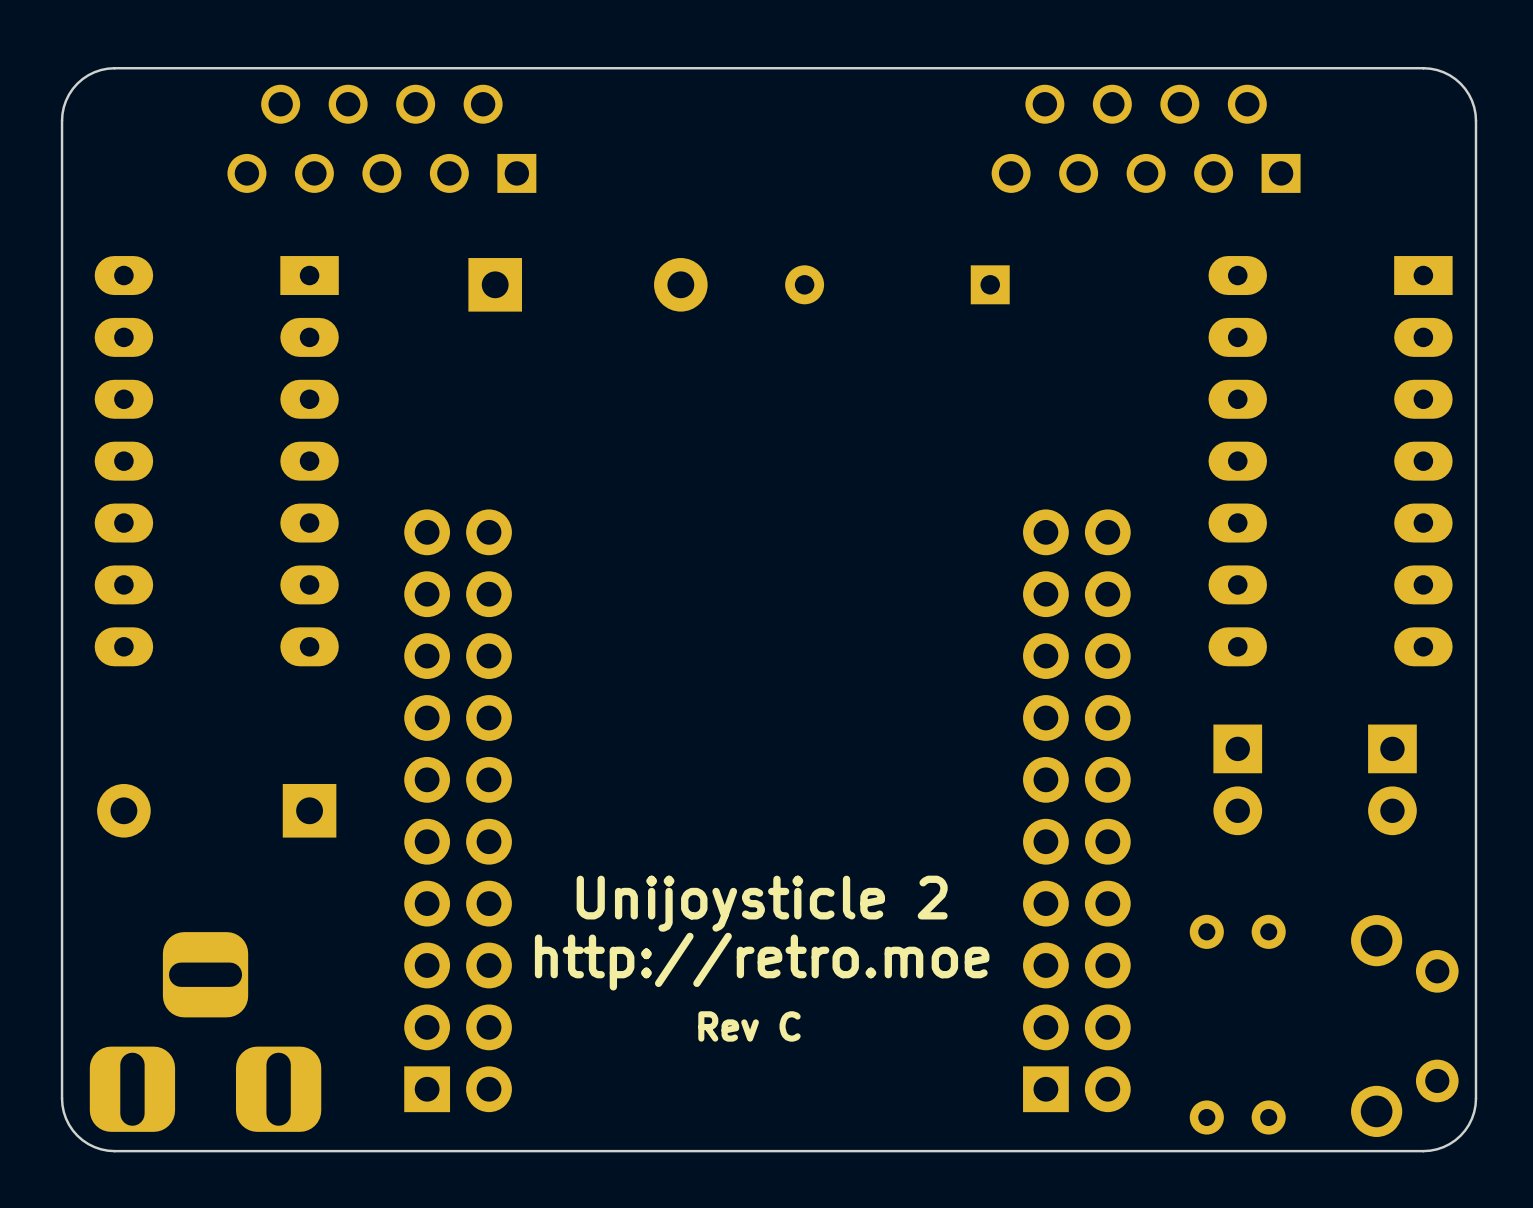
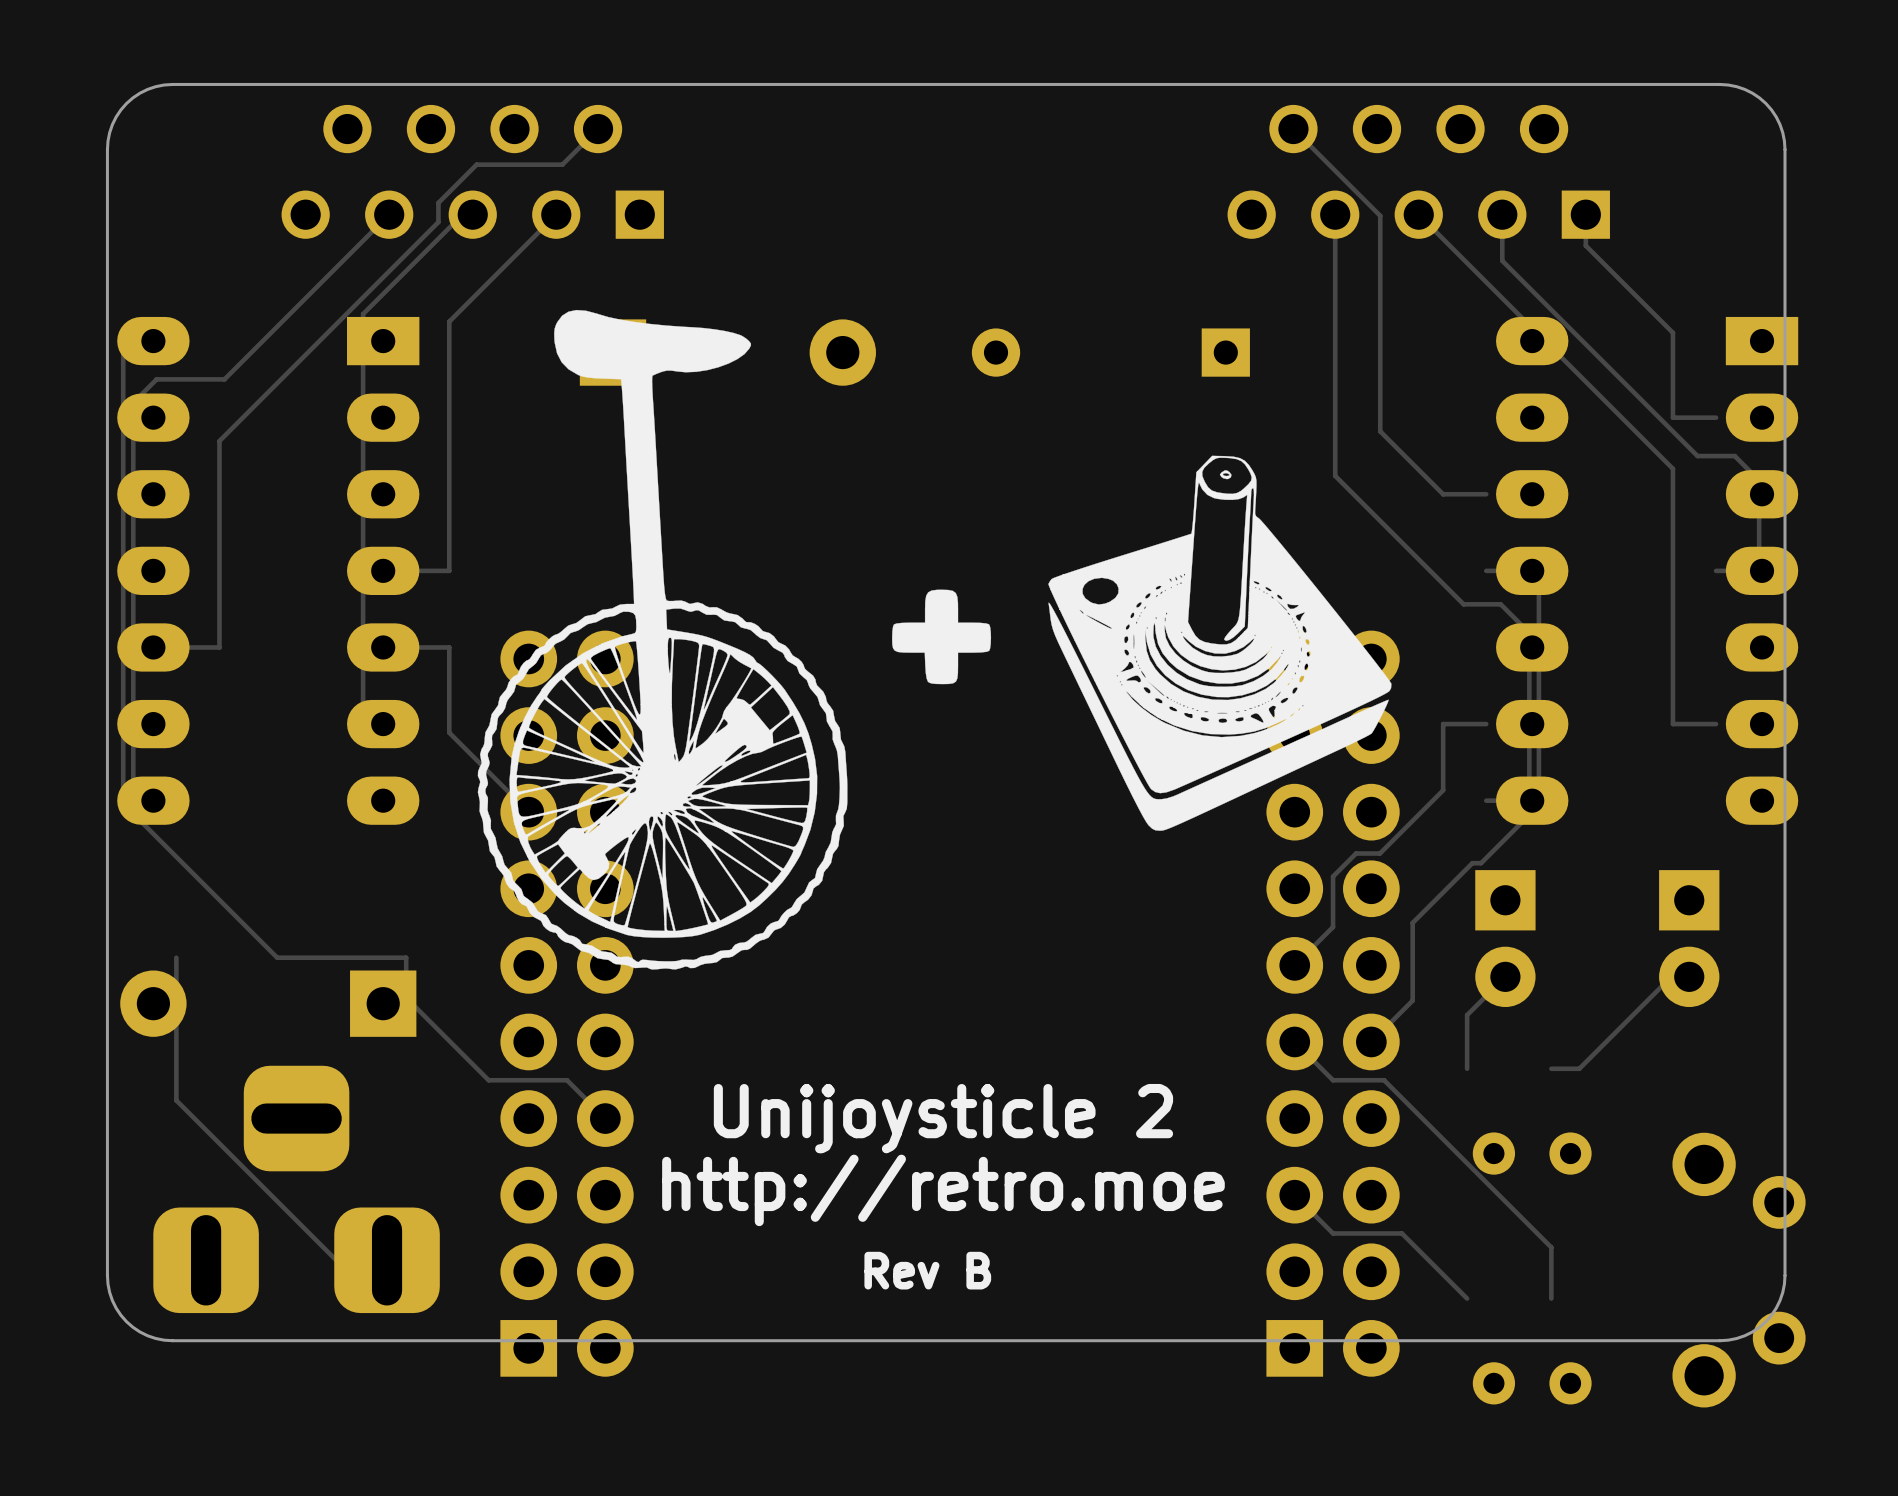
board edge: (1389, 68) (1430, 68) (1449, 75) (1460, 83) (1468, 94) (1474, 107) (1475, 120) (1475, 1098) (1471, 1118) (1460, 1135) (1443, 1147) (1423, 1151) (114, 1151) (94, 1147) (82, 1140) (69, 1124) (63, 1112) (62, 1098) (62, 120) (63, 107) (69, 94) (82, 79) (94, 72) (107, 68) (139, 68) -> (1719, 84) (1744, 89) (1765, 103) (1780, 124) (1785, 149) (1785, 1275) (1780, 1300) (1765, 1321) (1744, 1335) (1719, 1340) (172, 1340) (155, 1338) (132, 1327) (116, 1308) (109, 1292) (107, 1275) (107, 149) (112, 124) (126, 103) (147, 89) (172, 84)
track: none -> (598, 129) (562, 164) (476, 164) (438, 202) (438, 222) (219, 441) (219, 647) (176, 647)
track: none -> (1293, 129) (1380, 215) (1380, 431) (1443, 494) (1486, 494)
track: none -> (389, 214) (224, 379) (156, 379) (133, 402) (133, 800) (176, 800)
track: none -> (472, 214) (462, 214) (363, 314) (363, 724) (406, 724)
track: none -> (556, 214) (449, 321) (449, 570) (406, 570)
track: none -> (1335, 214) (1335, 475) (1463, 604) (1500, 604) (1529, 632) (1529, 800) (1486, 800)
track: none -> (1418, 214) (1672, 468) (1672, 724) (1716, 724)
track: none -> (1502, 214) (1502, 260) (1697, 456) (1734, 456) (1759, 480) (1759, 570) (1716, 570)
track: none -> (1585, 214) (1585, 245) (1672, 332) (1672, 417) (1716, 417)
drawing: none -> [477, 309, 1392, 970]
track: none -> (176, 341) (133, 341) (123, 351) (123, 803) (277, 957) (406, 957) (406, 997) (488, 1080) (567, 1080) (605, 1118)
track: none -> (1486, 570) (1529, 570) (1538, 580) (1538, 805) (1481, 863) (1472, 863) (1412, 922) (1412, 1000) (1371, 1041)
track: none -> (406, 647) (449, 647) (449, 732) (528, 812)
track: none -> (1486, 724) (1443, 724) (1443, 790) (1379, 853) (1356, 853) (1333, 876) (1333, 927) (1294, 965)
track: none -> (176, 957) (176, 1100) (336, 1260) (387, 1260)
part position: (1237, 779) -> (1505, 938)
part position: (1392, 779) -> (1689, 938)
track: none -> (1505, 976) (1467, 1015) (1467, 1068)
track: none -> (1689, 976) (1671, 976) (1579, 1068) (1551, 1068)
track: none -> (1294, 1041) (1333, 1080) (1384, 1080) (1551, 1247) (1551, 1298)
track: none -> (1294, 1195) (1333, 1233) (1401, 1233) (1467, 1298)
text: Rev C (749, 1026) -> Rev B (927, 1270)
part position: (205, 1031) -> (296, 1189)

